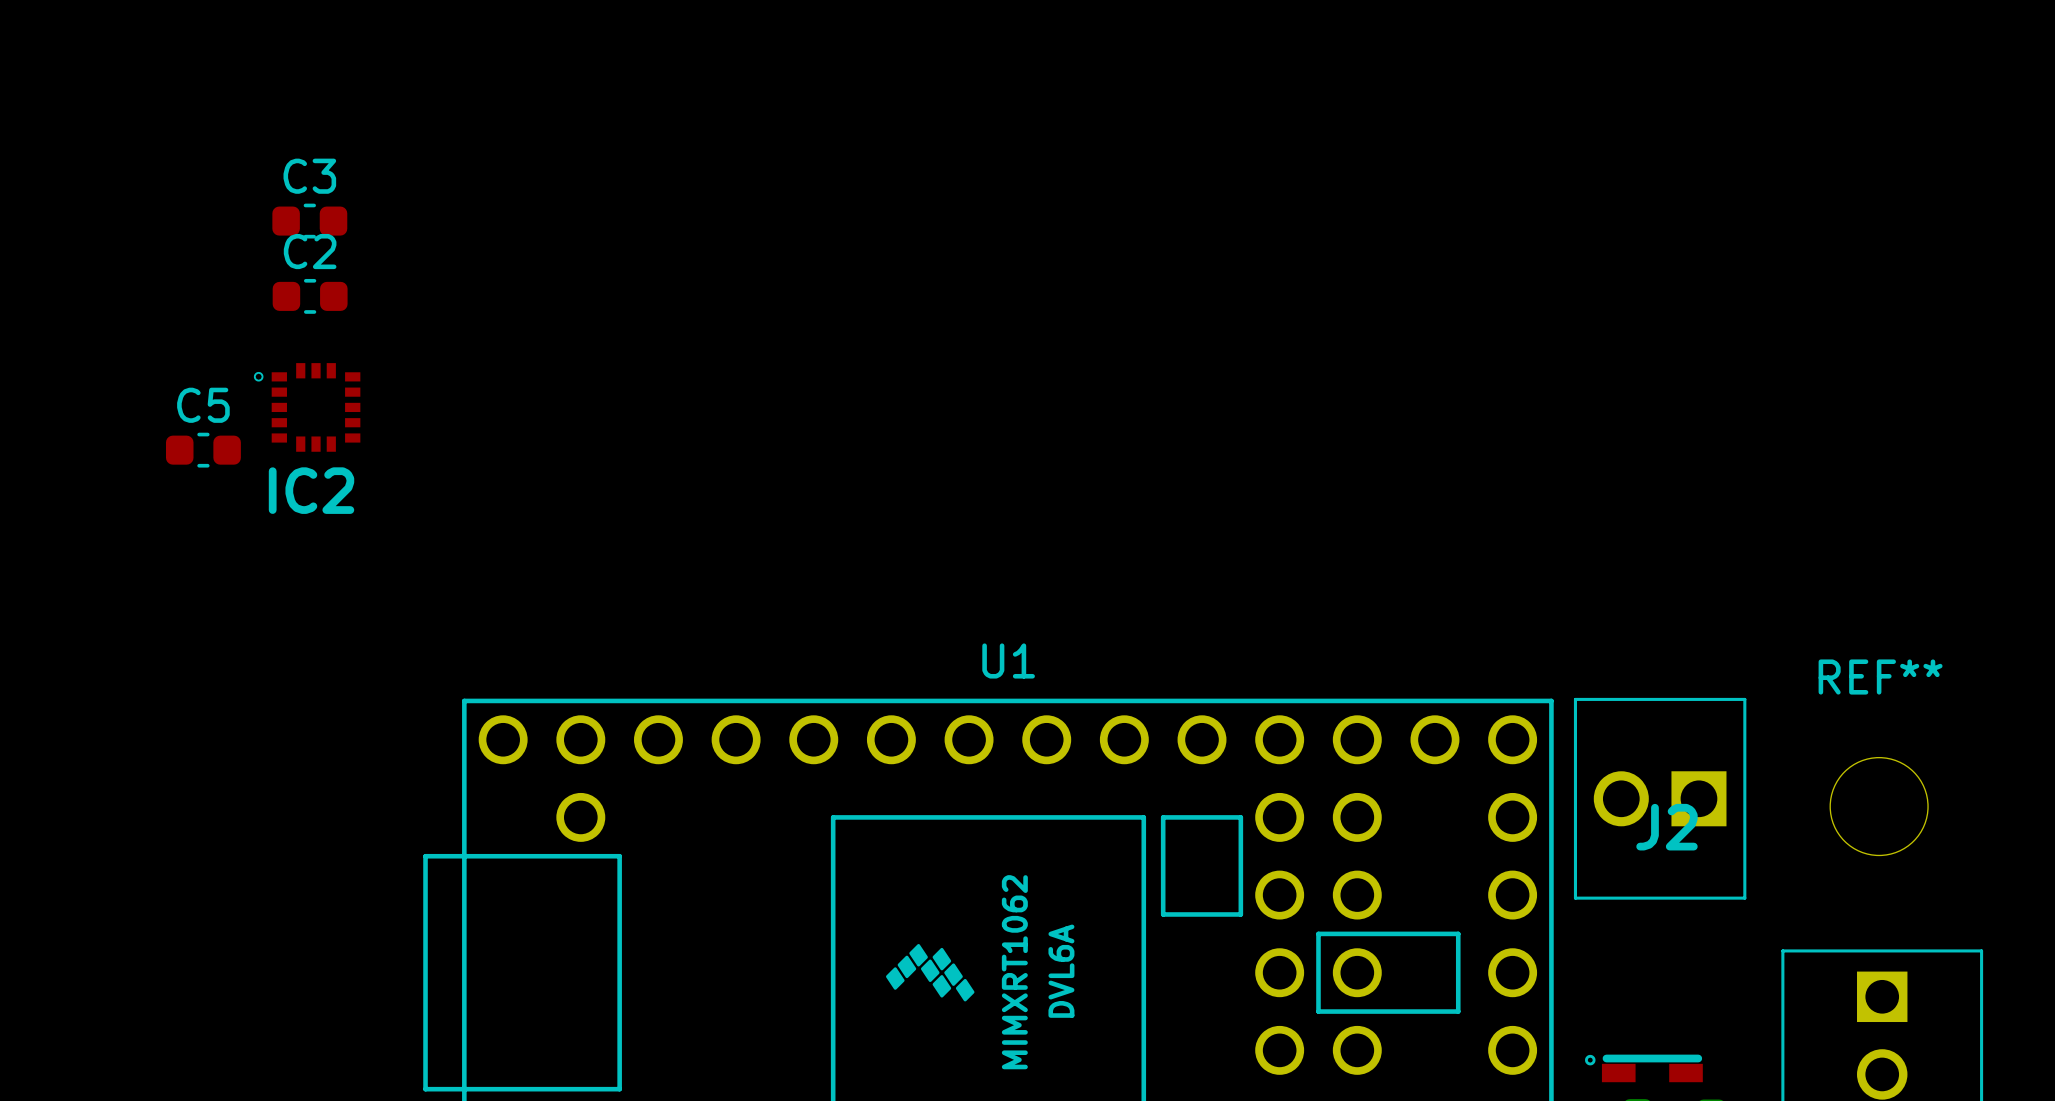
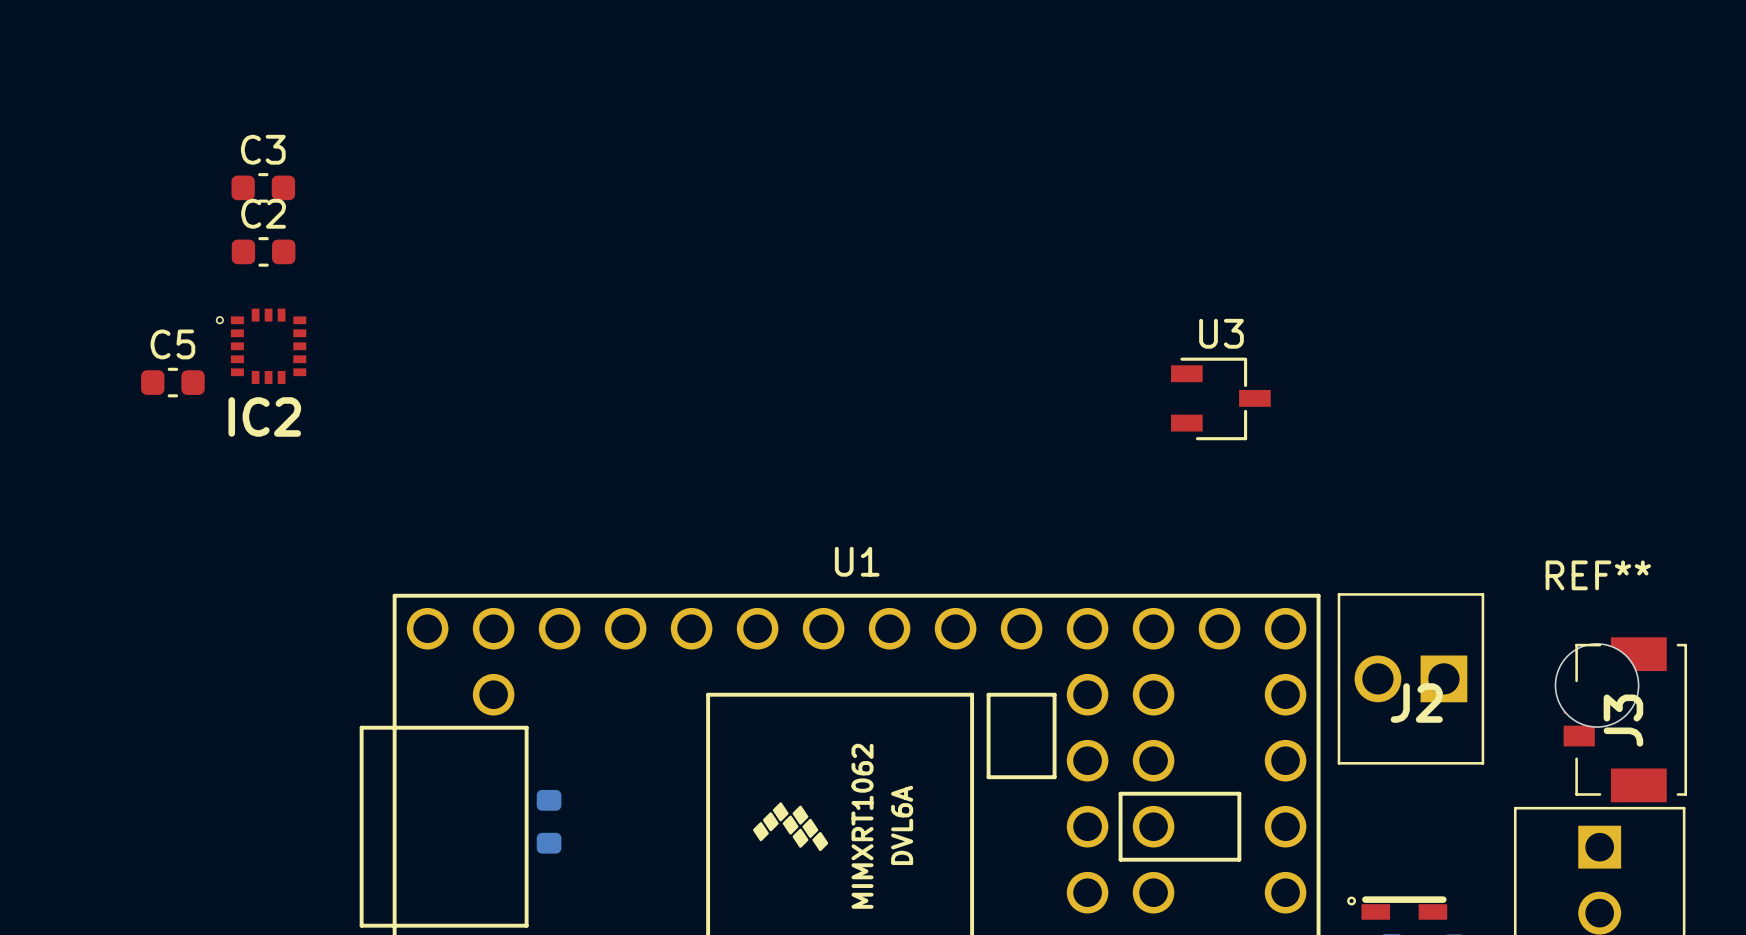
U3: none -> (1220, 398)
J3: none -> (1625, 719)
part: none -> (549, 821)

